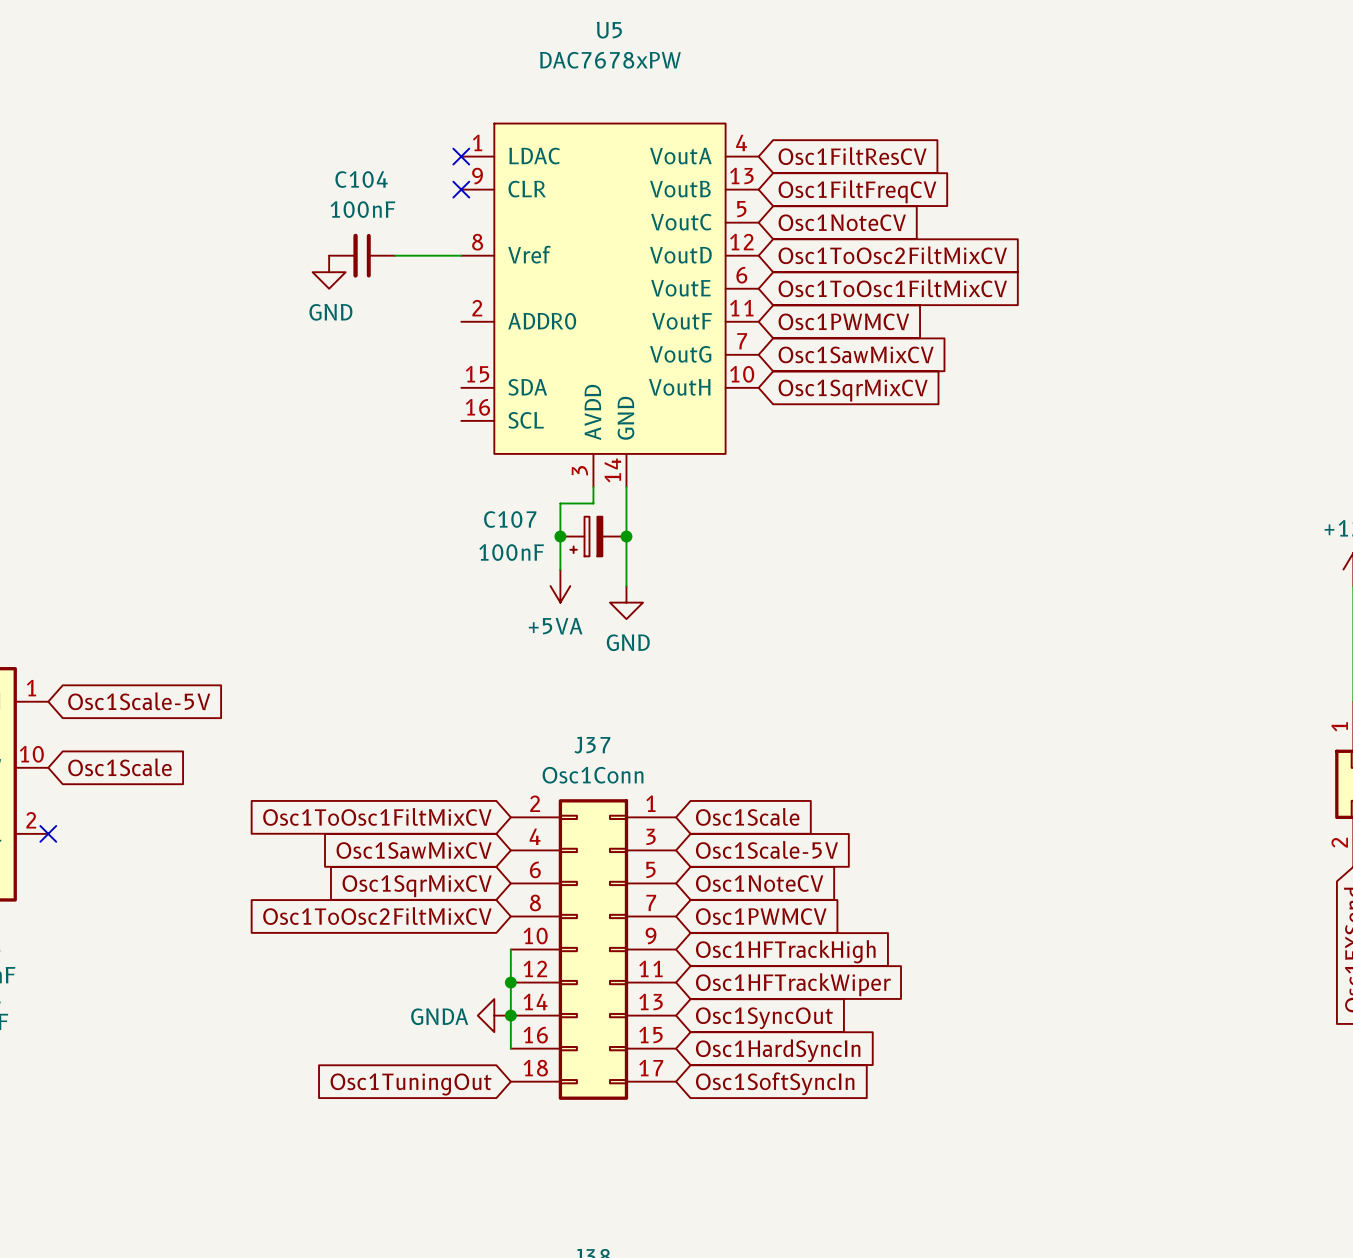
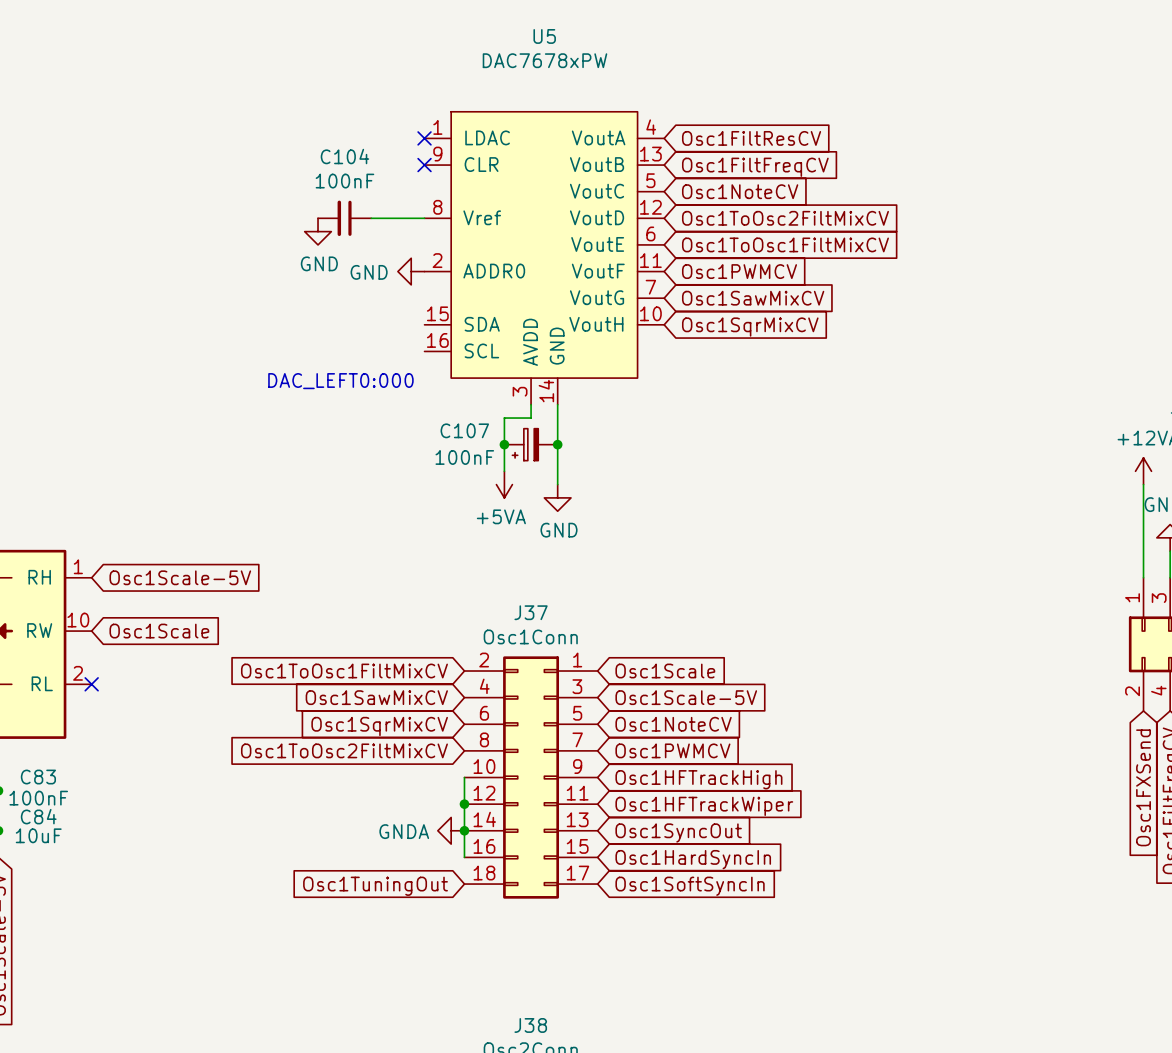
power symbol: none -> GND (411, 271)
text: none -> DAC_LEFT0:000 (340, 381)

